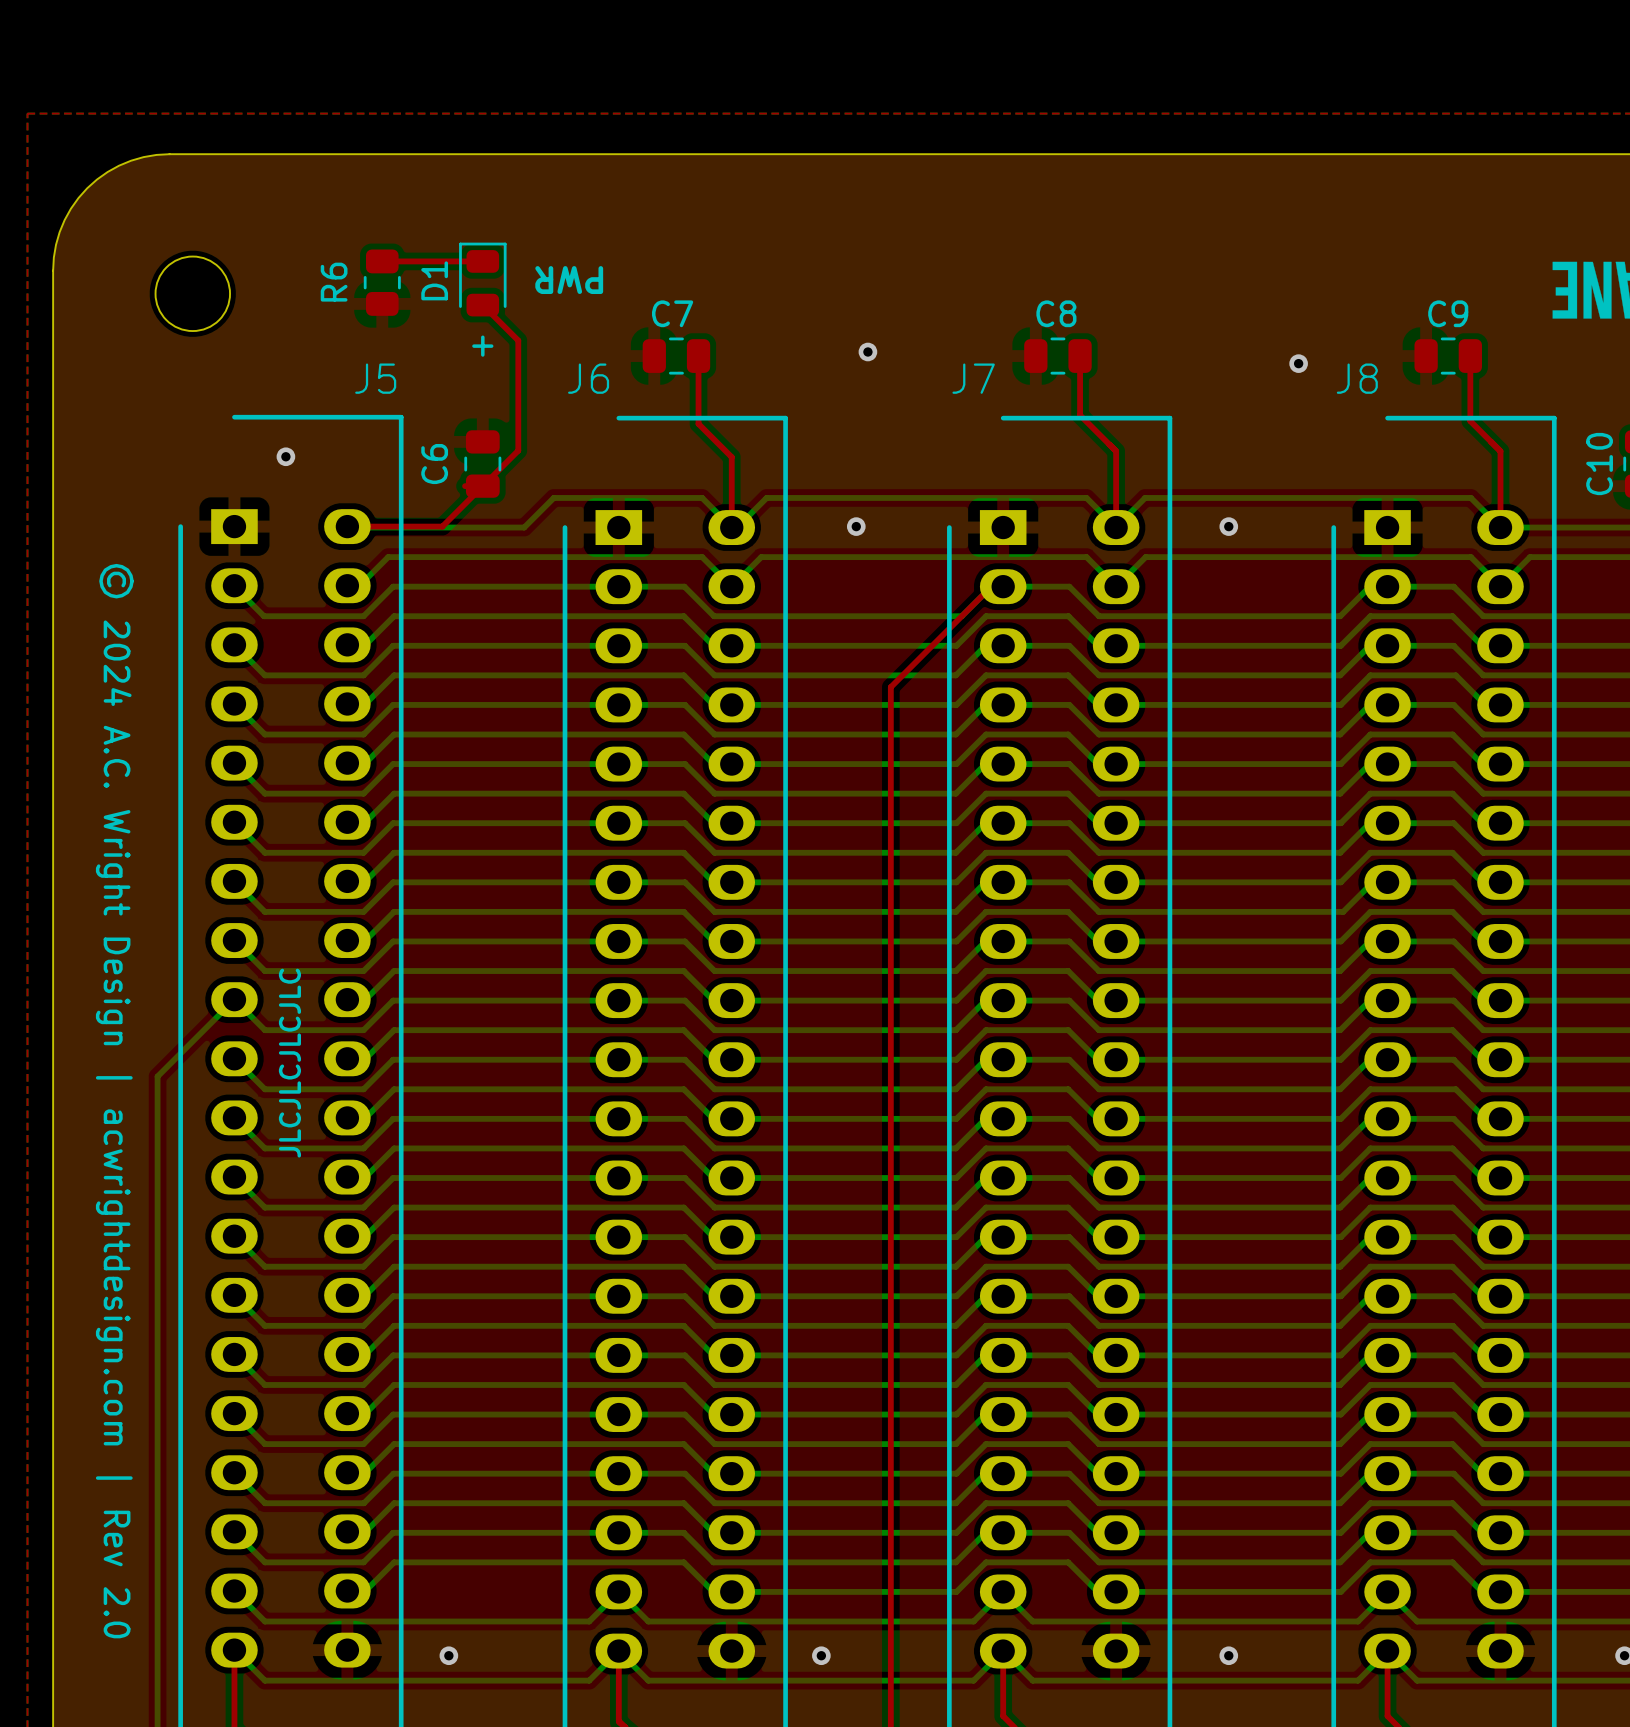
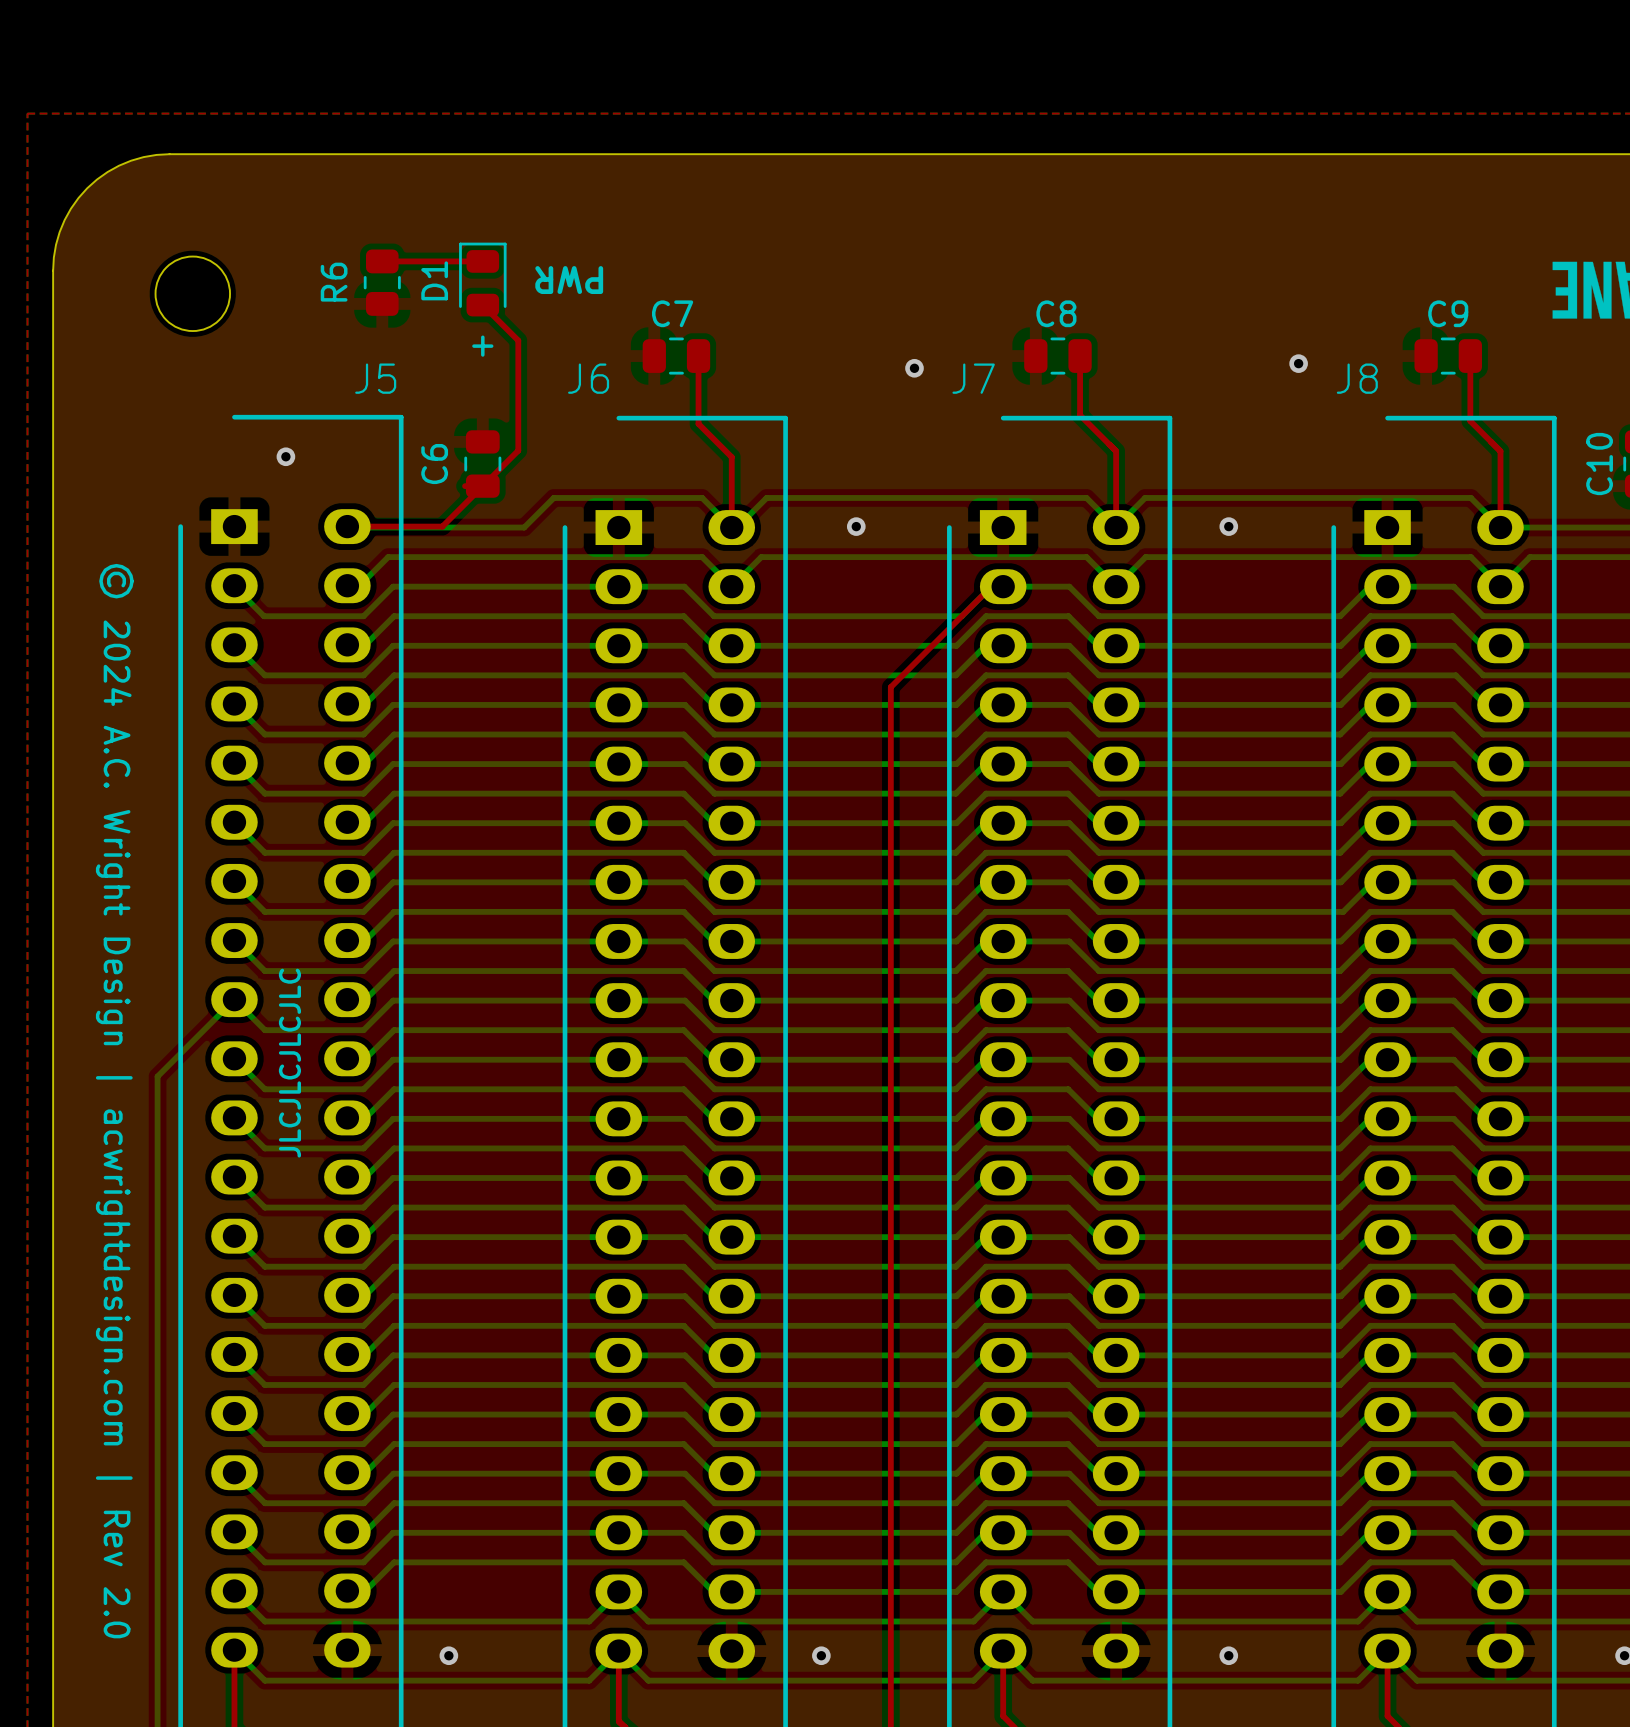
via position: (867, 351) -> (914, 368)

